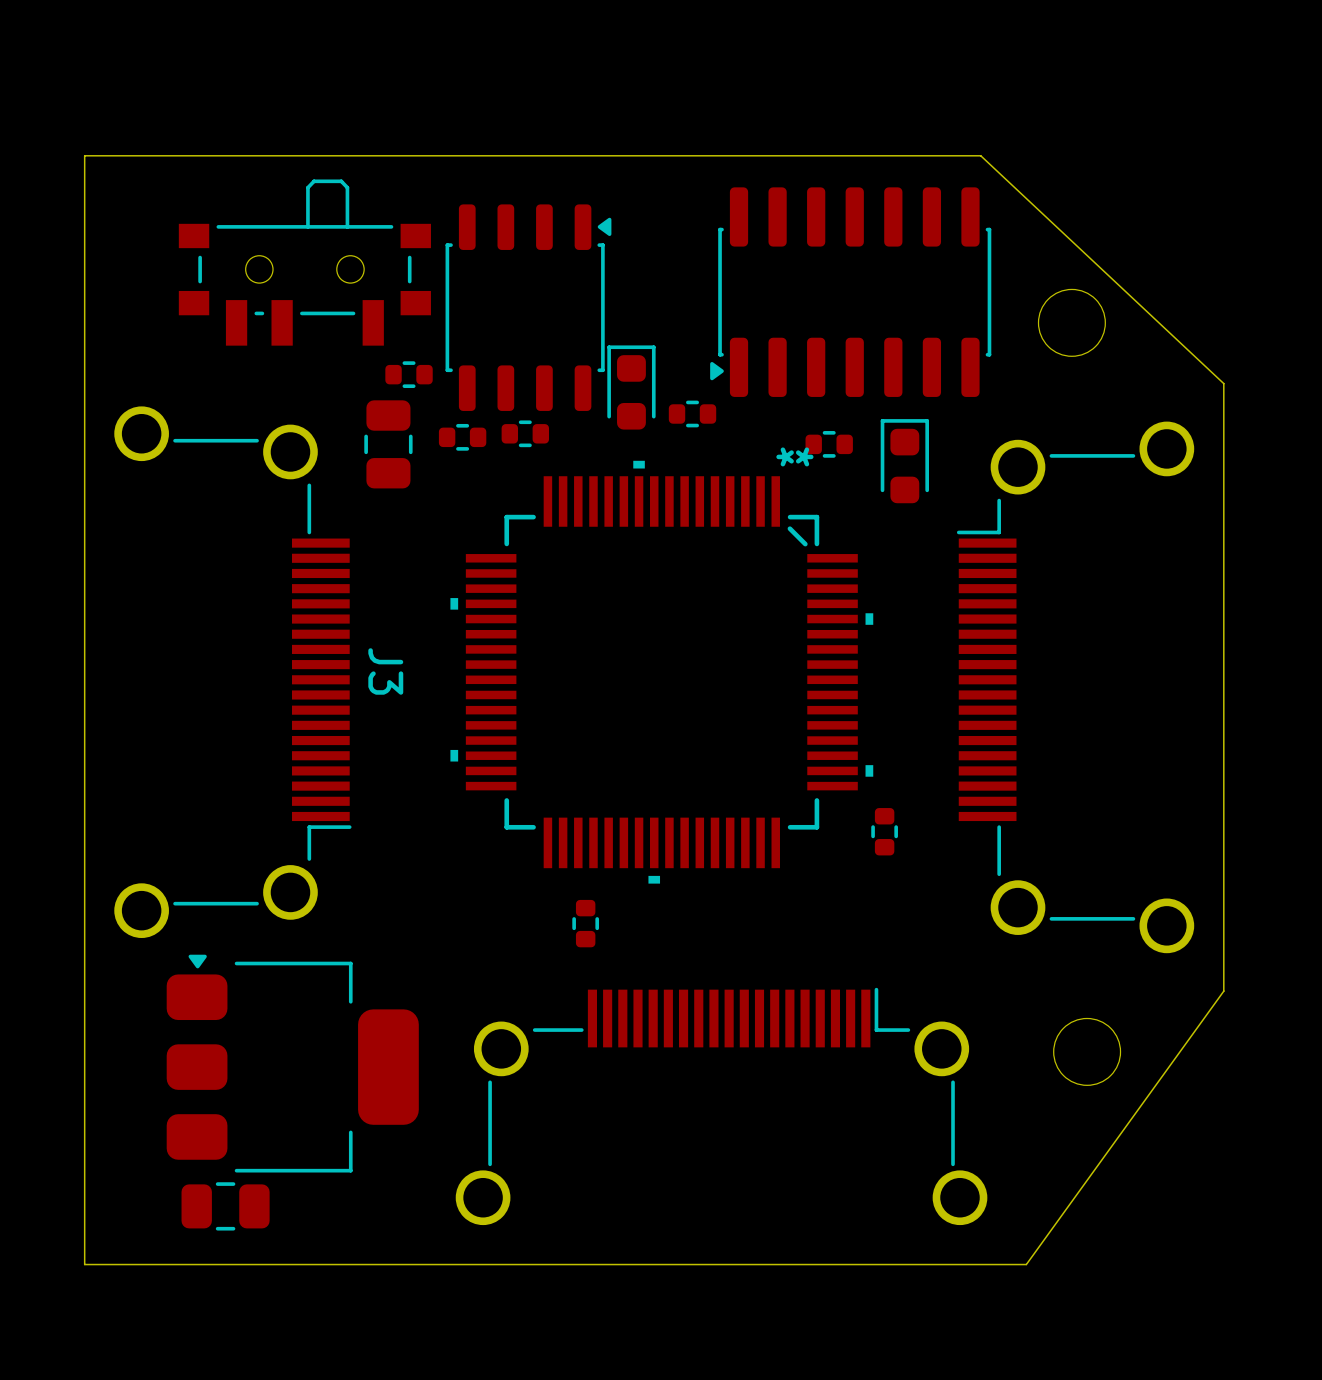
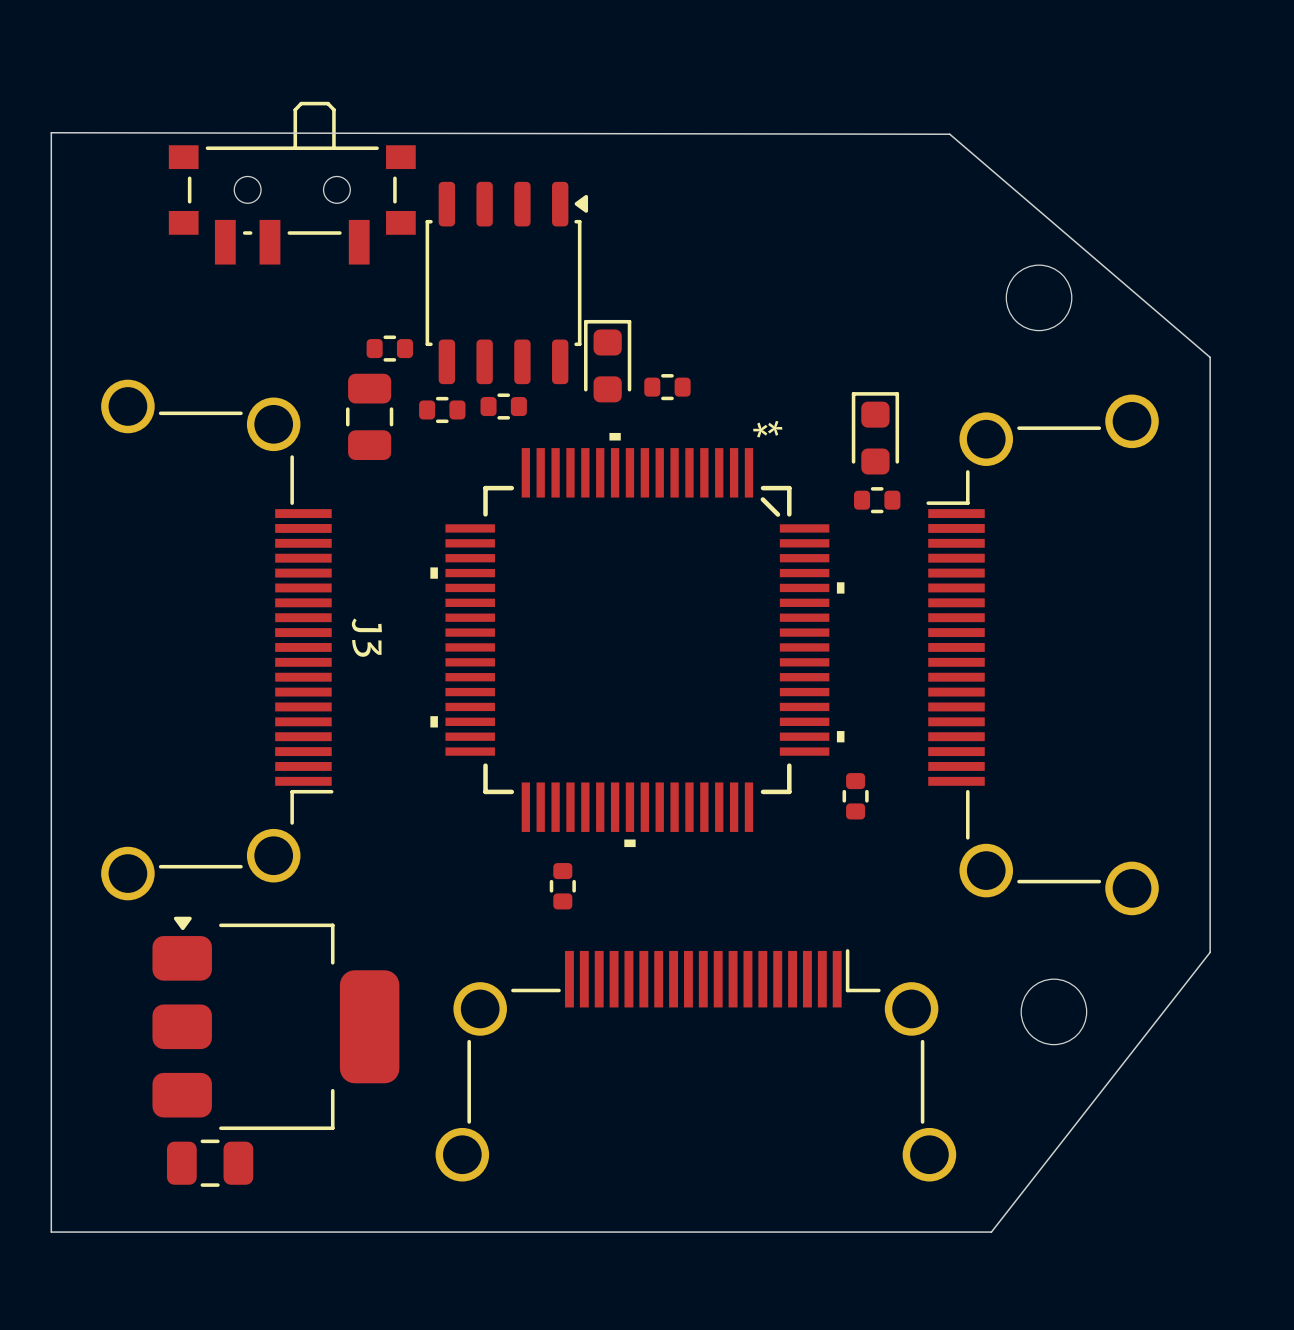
board edge: (84, 155) (980, 155) (1223, 383) (1223, 991) (1026, 1264) (84, 1264) (84, 155) -> (51, 132) (51, 1232) (991, 1232) (1210, 952) (1210, 357) (949, 134) (51, 132)
part position: (304, 262) -> (292, 183)
part: (850, 292) -> none
part position: (829, 444) -> (877, 500)

